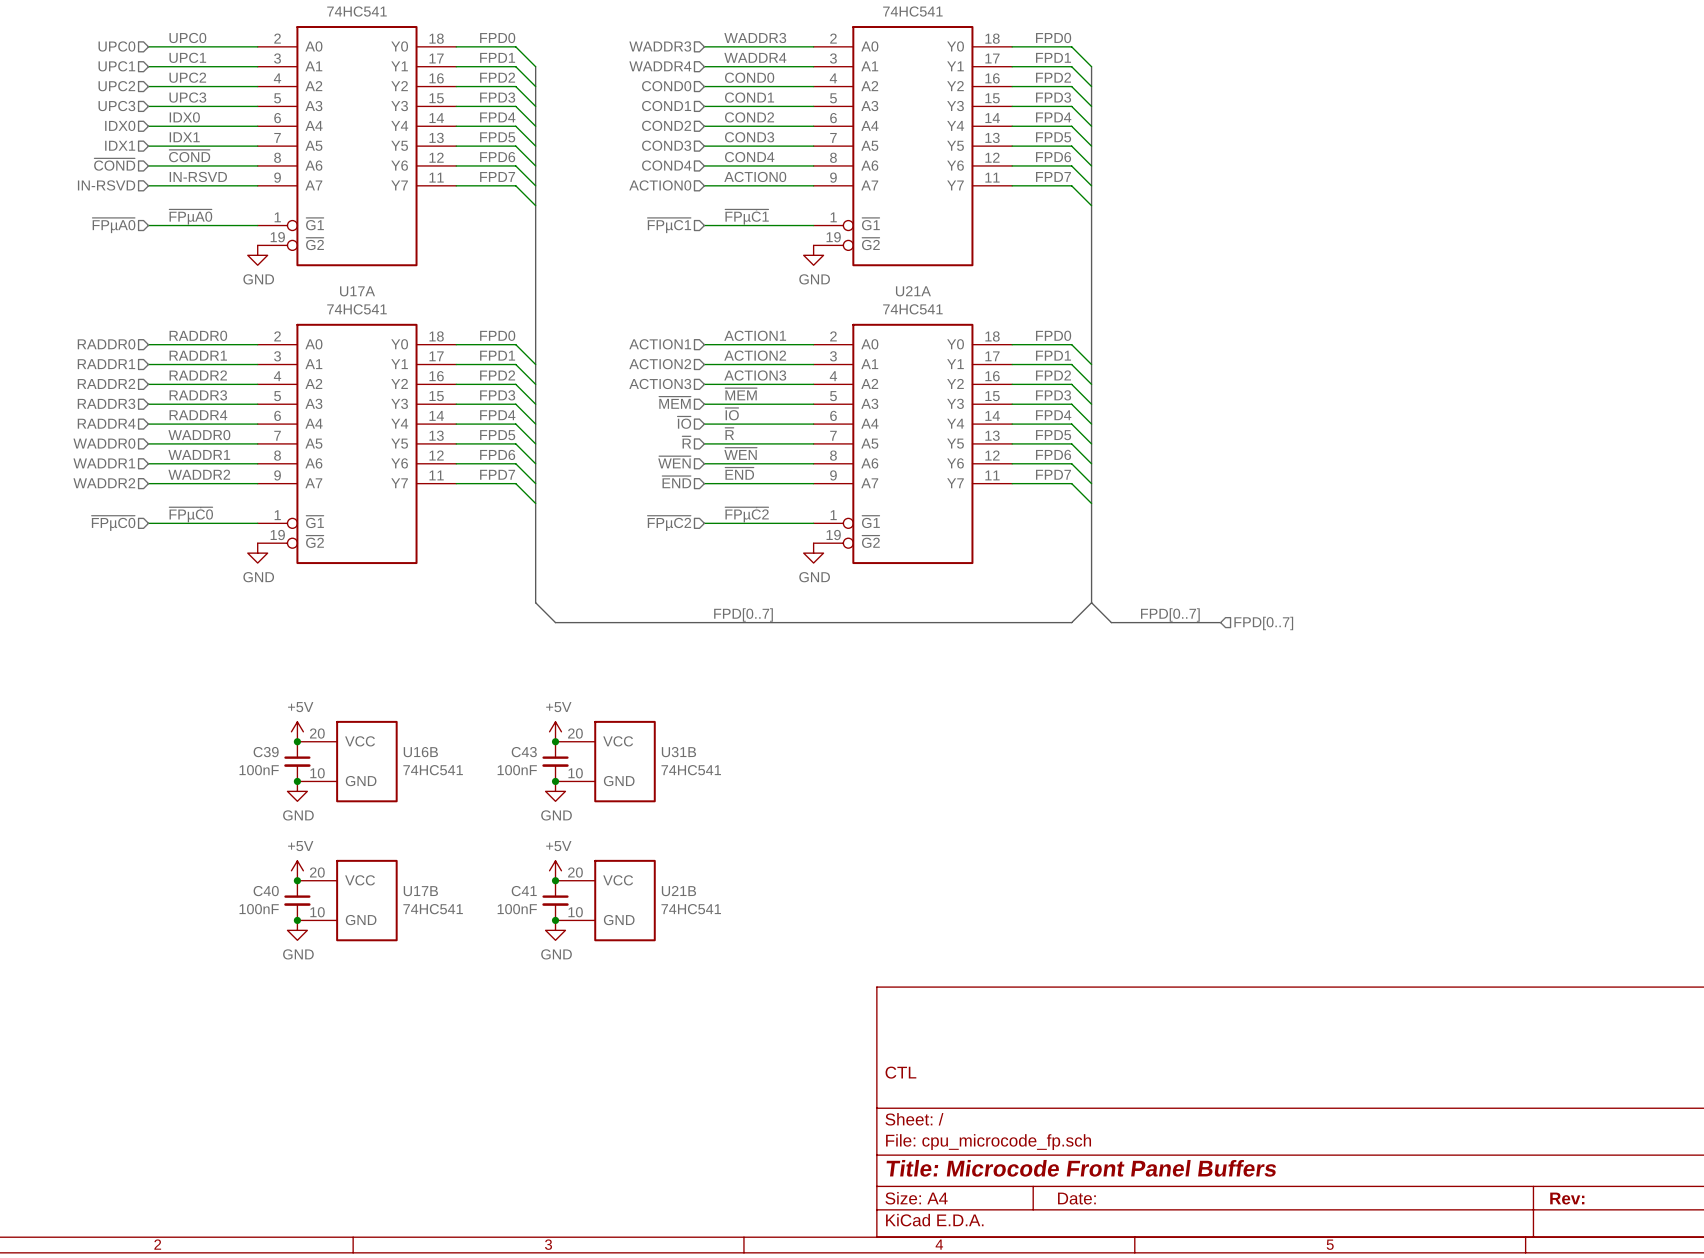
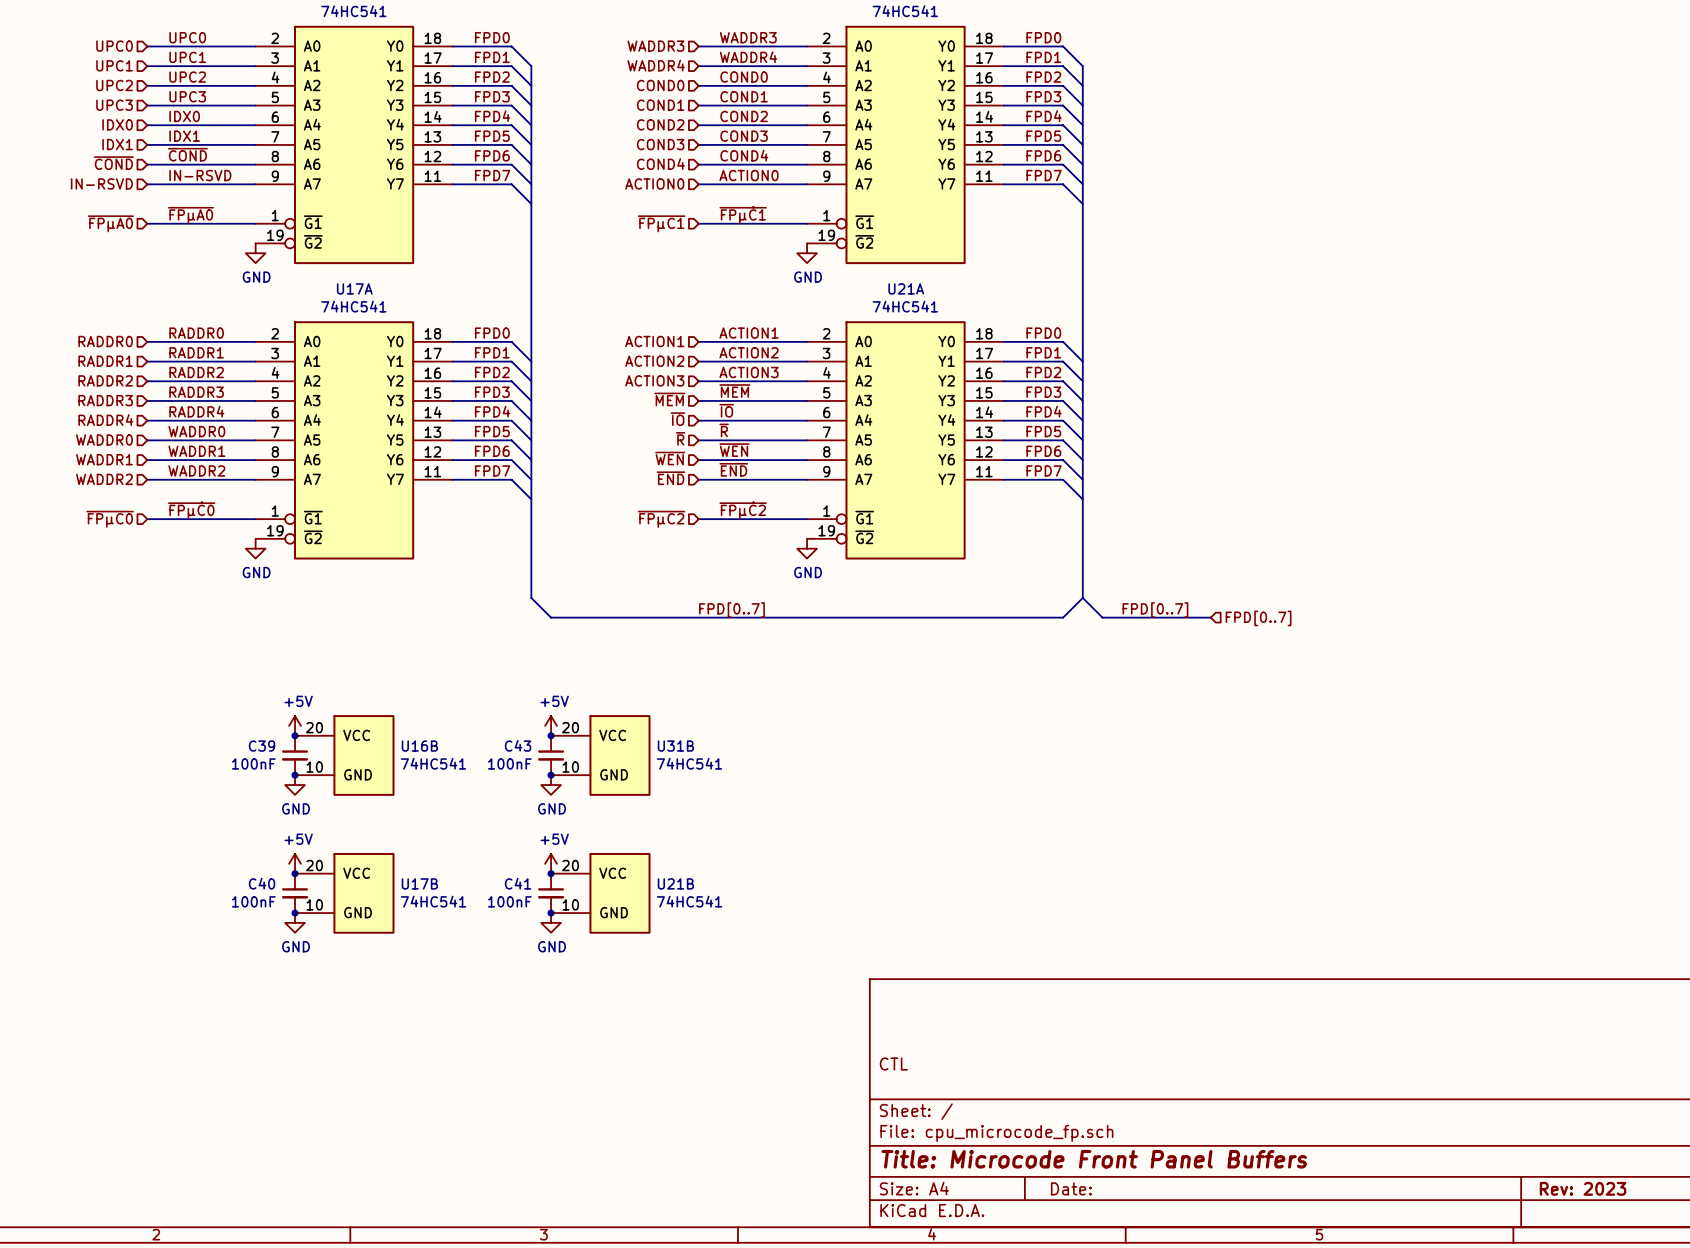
title block: Rev: (1567, 1198) -> Rev: 2023 (1583, 1188)

